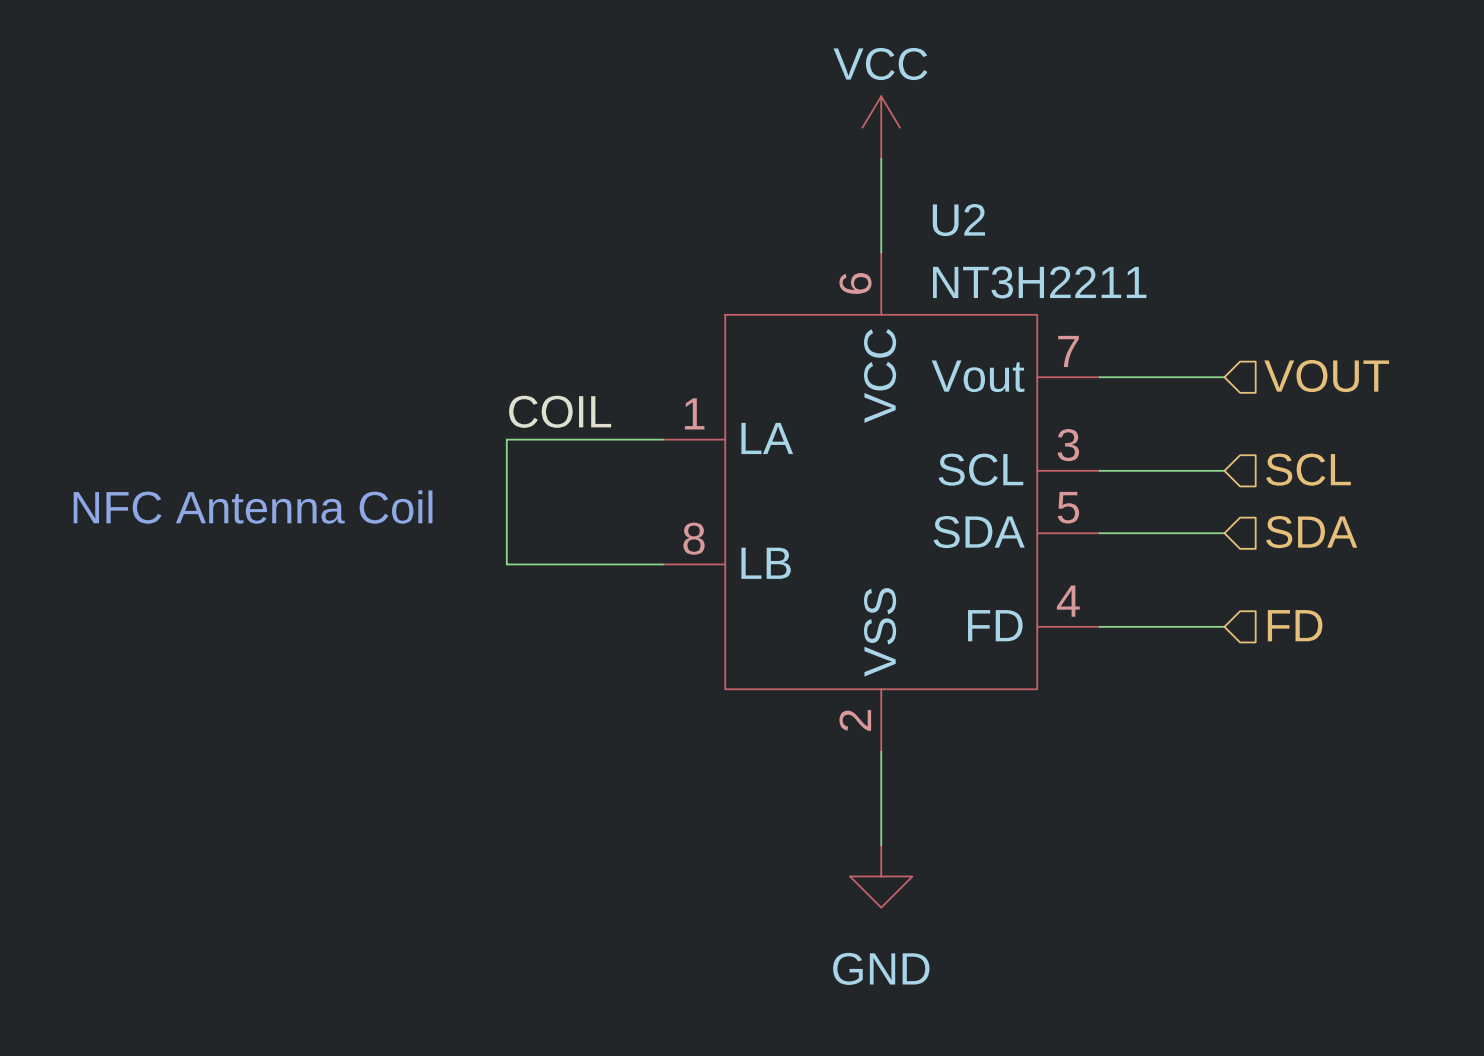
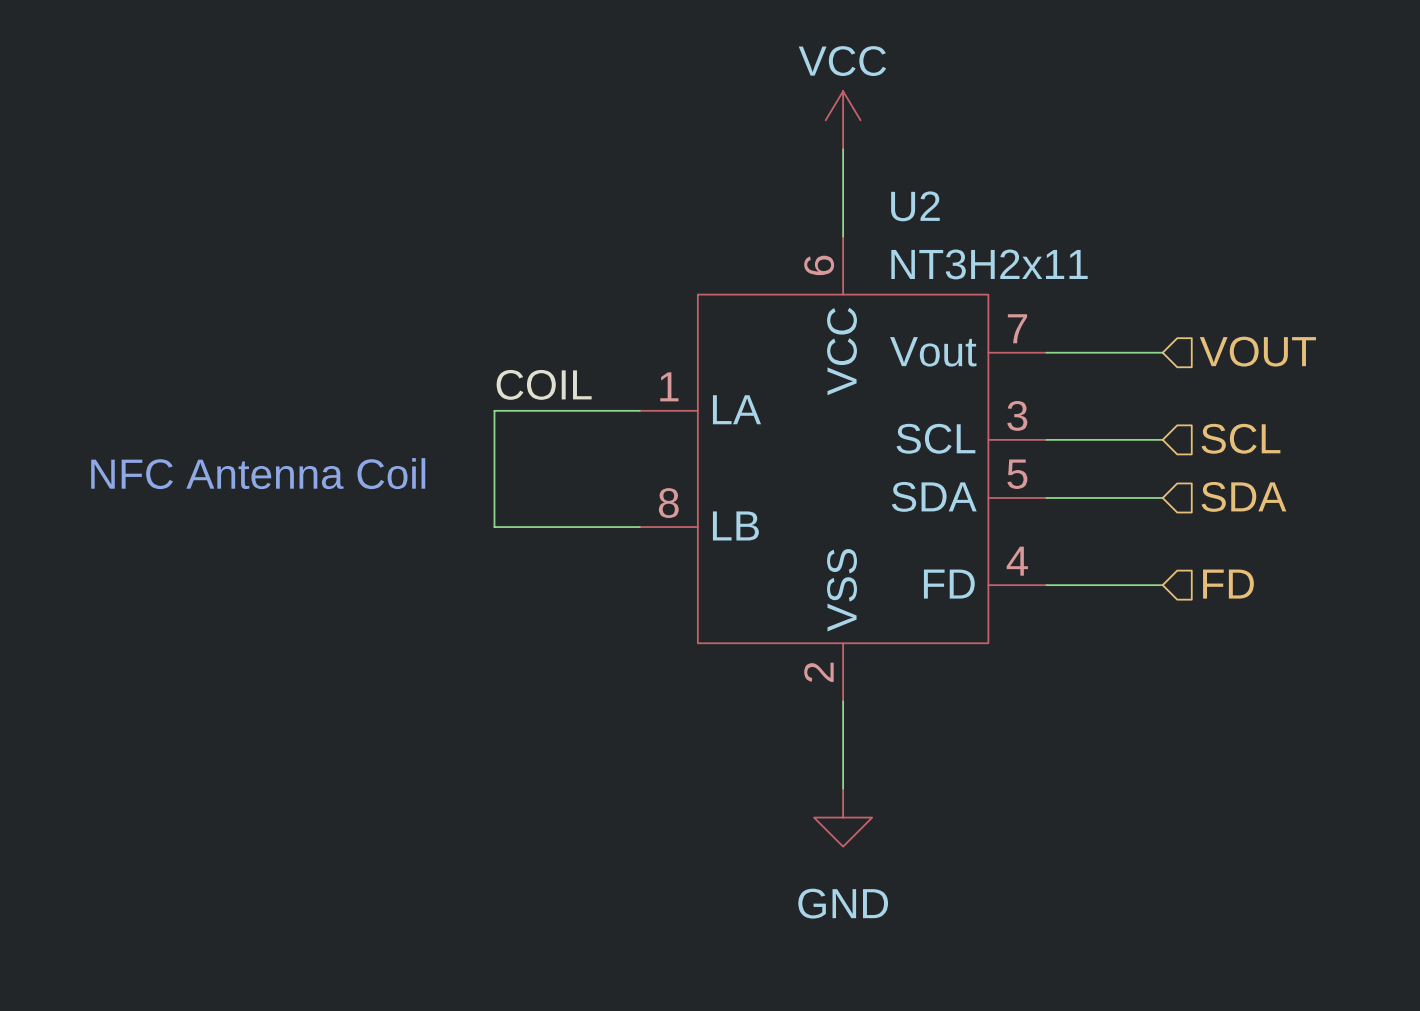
U2 value: NT3H2211 (1039, 282) -> NT3H2x11 (989, 264)

